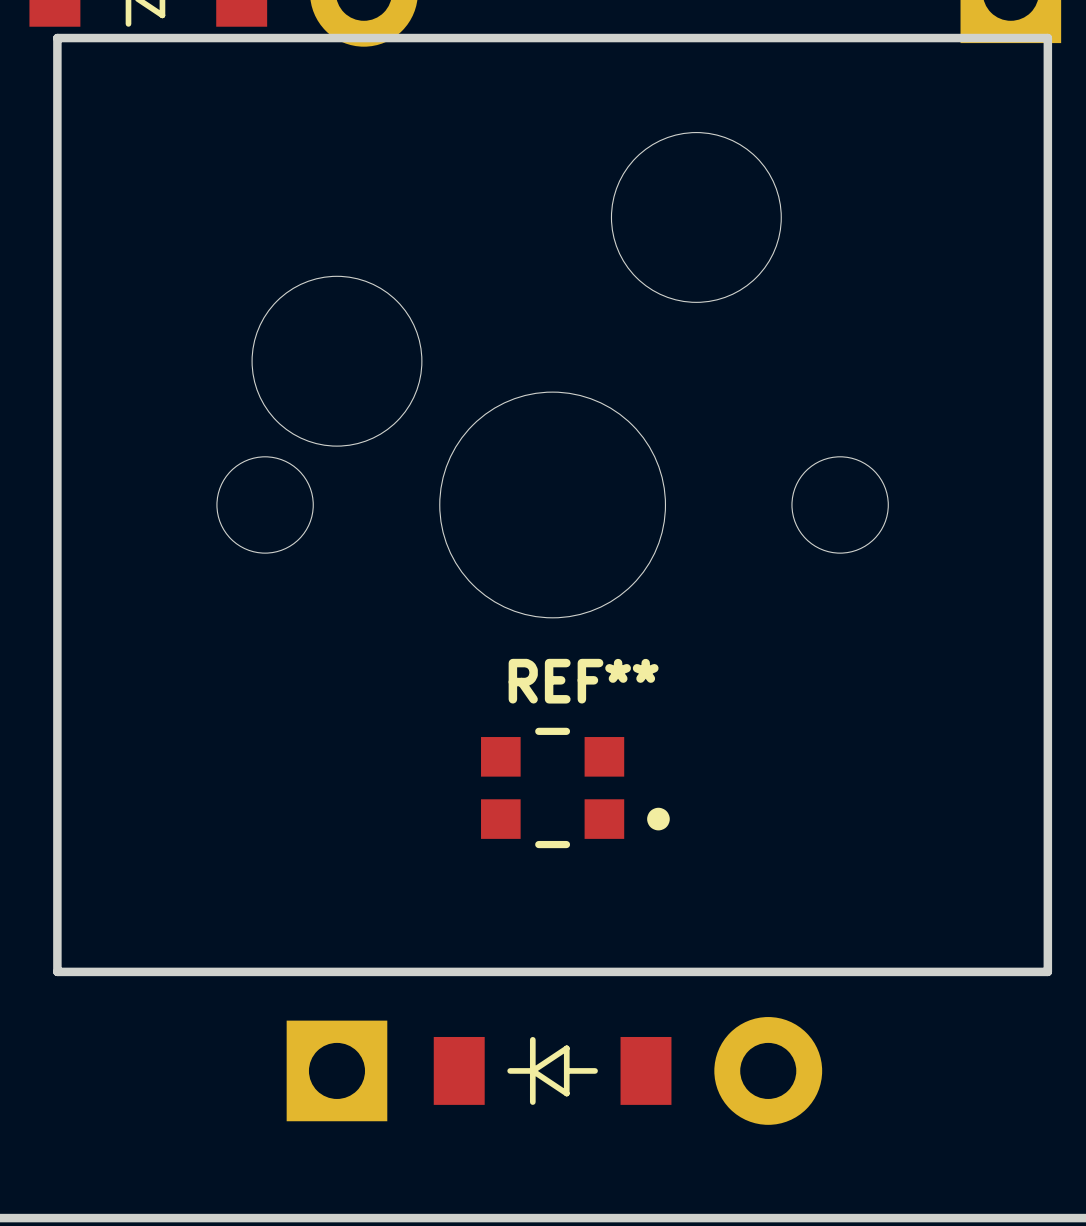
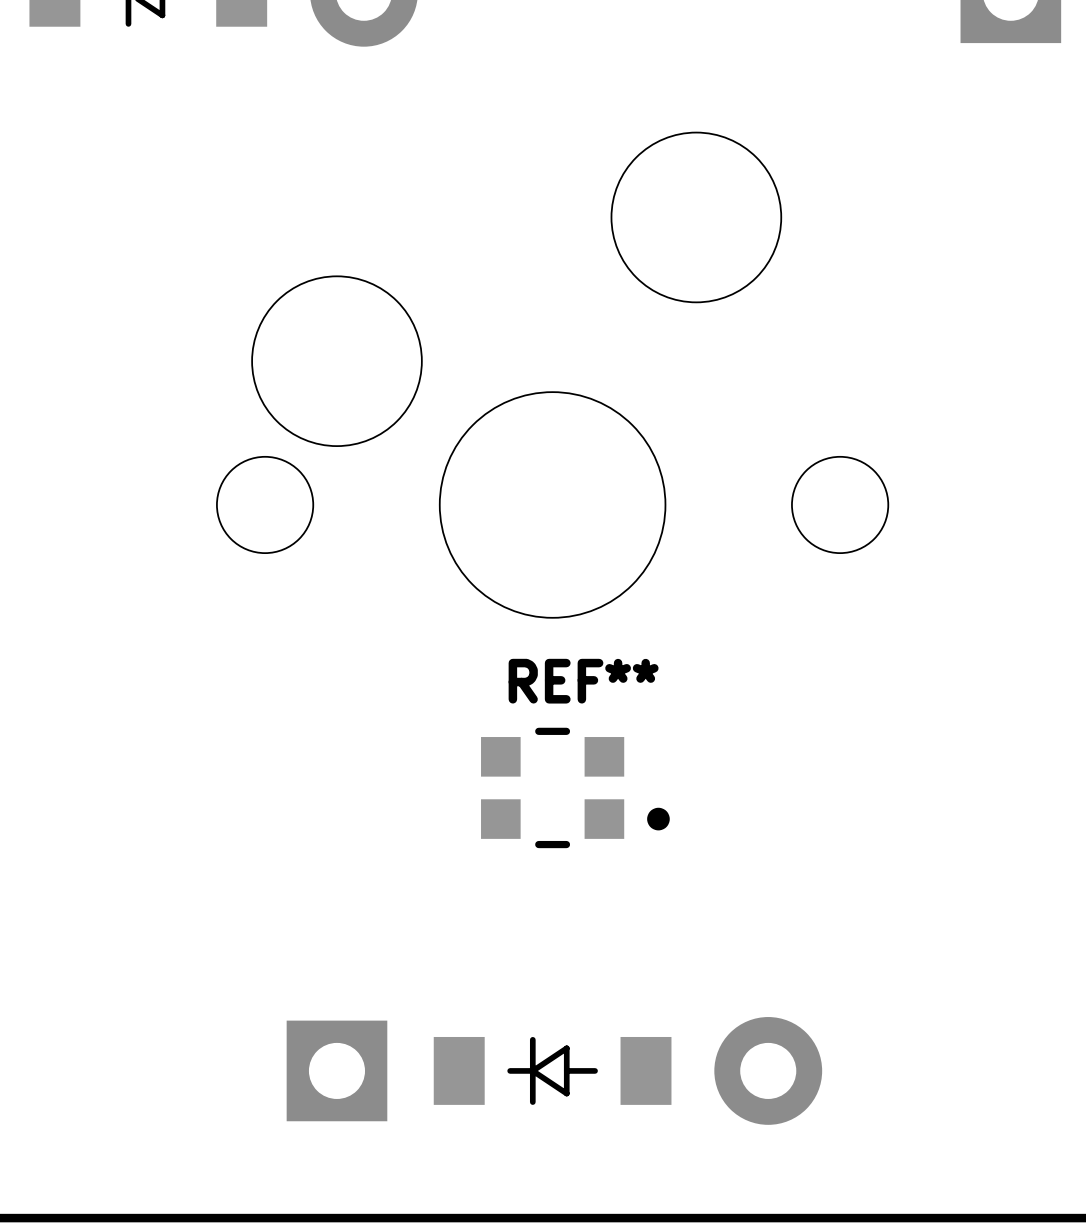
board edge: (57, 38) (1047, 38) (1047, 971) (57, 971) (57, 38) -> none

